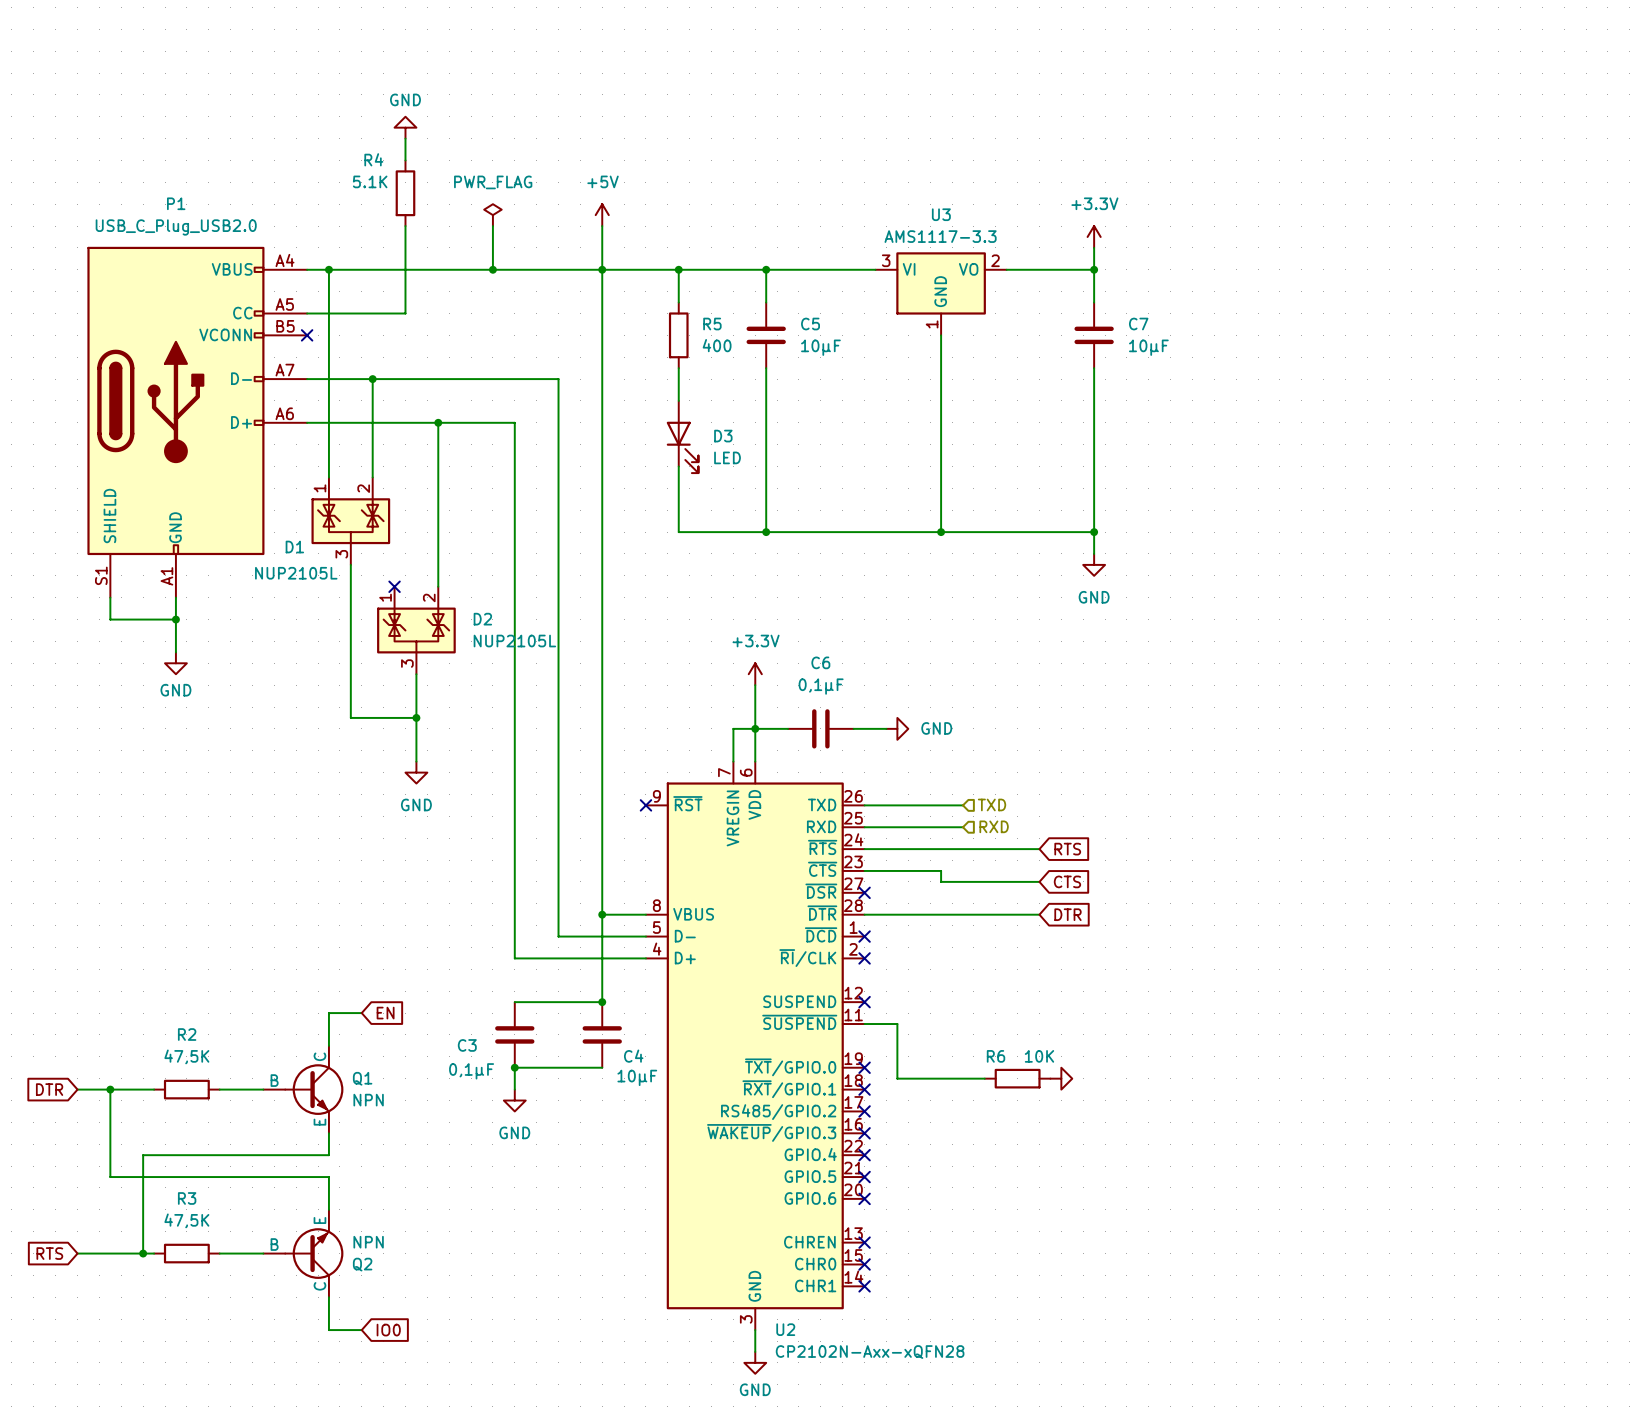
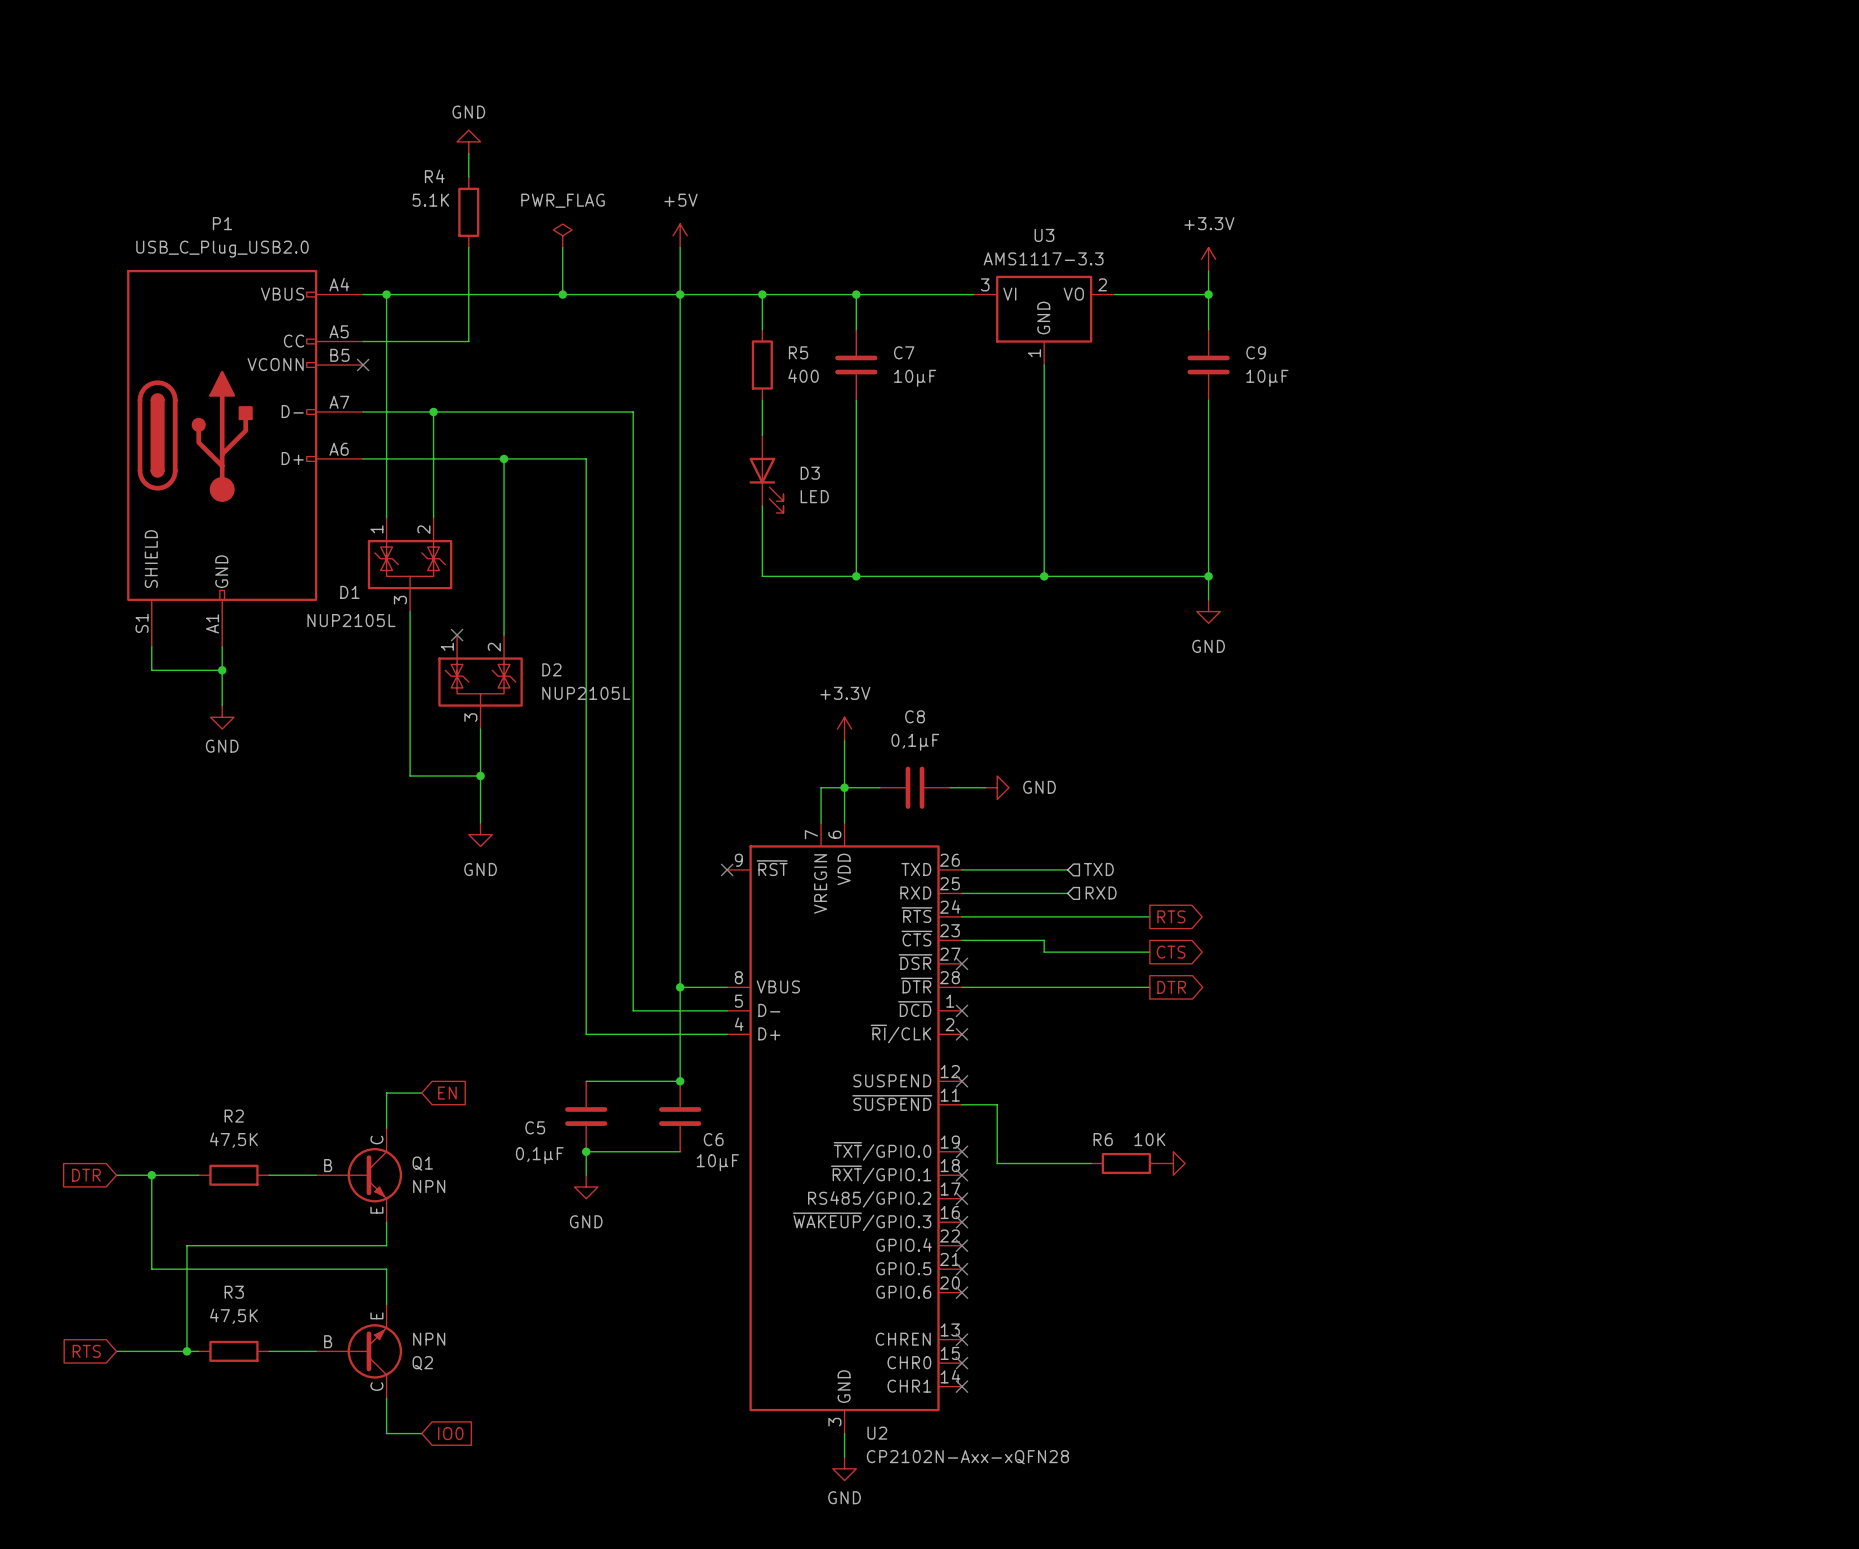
C5 name: C5 (810, 324) -> C7 (904, 352)
C7 name: C7 (1138, 324) -> C9 (1256, 352)
C6 name: C6 (820, 662) -> C8 (915, 716)
global label shape: input (1067, 849) -> output (1171, 916)
global label shape: input (1067, 881) -> output (1171, 952)
global label shape: input (1067, 914) -> output (1171, 987)
C3 name: C3 (467, 1045) -> C5 (535, 1127)
C4 name: C4 (633, 1056) -> C6 (713, 1139)

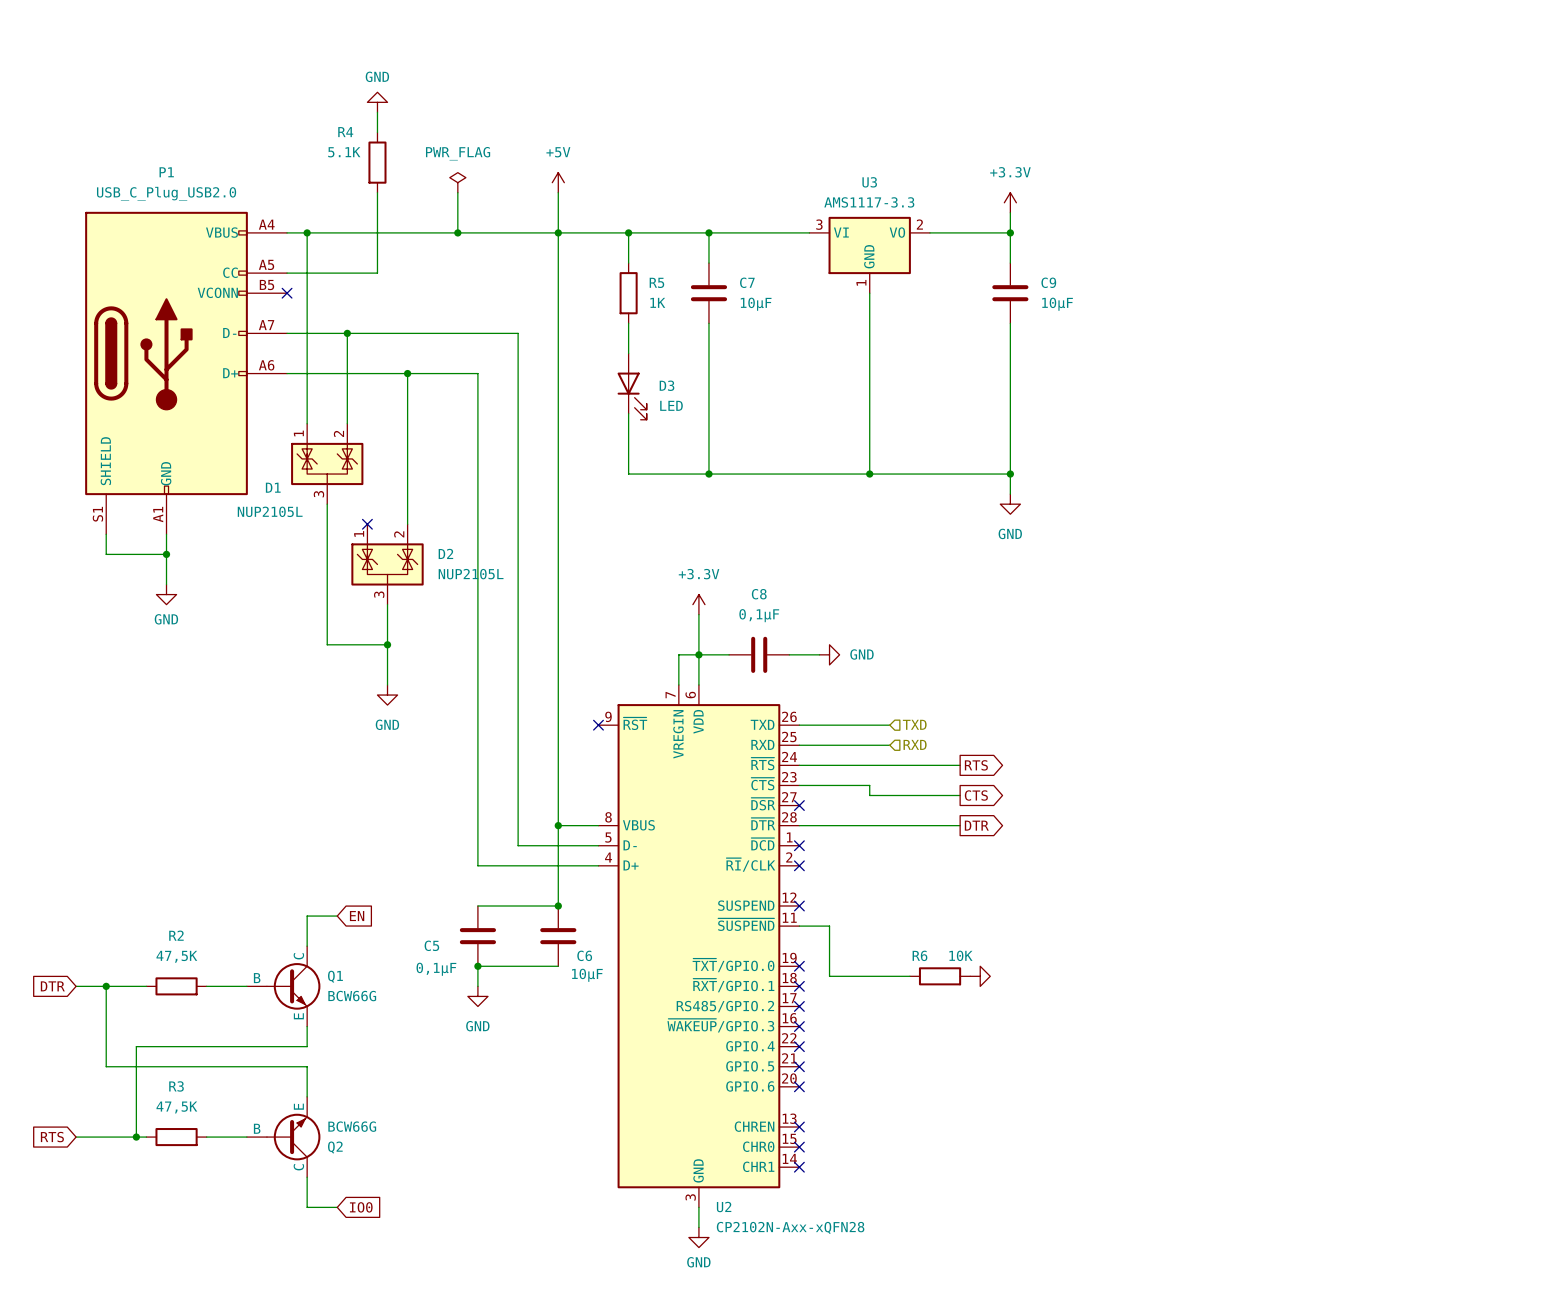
R5 value: 400 (803, 376) -> 1K (657, 302)
Q1 value: NPN (429, 1186) -> BCW66G (352, 996)
Q2 value: NPN (429, 1339) -> BCW66G (352, 1126)

